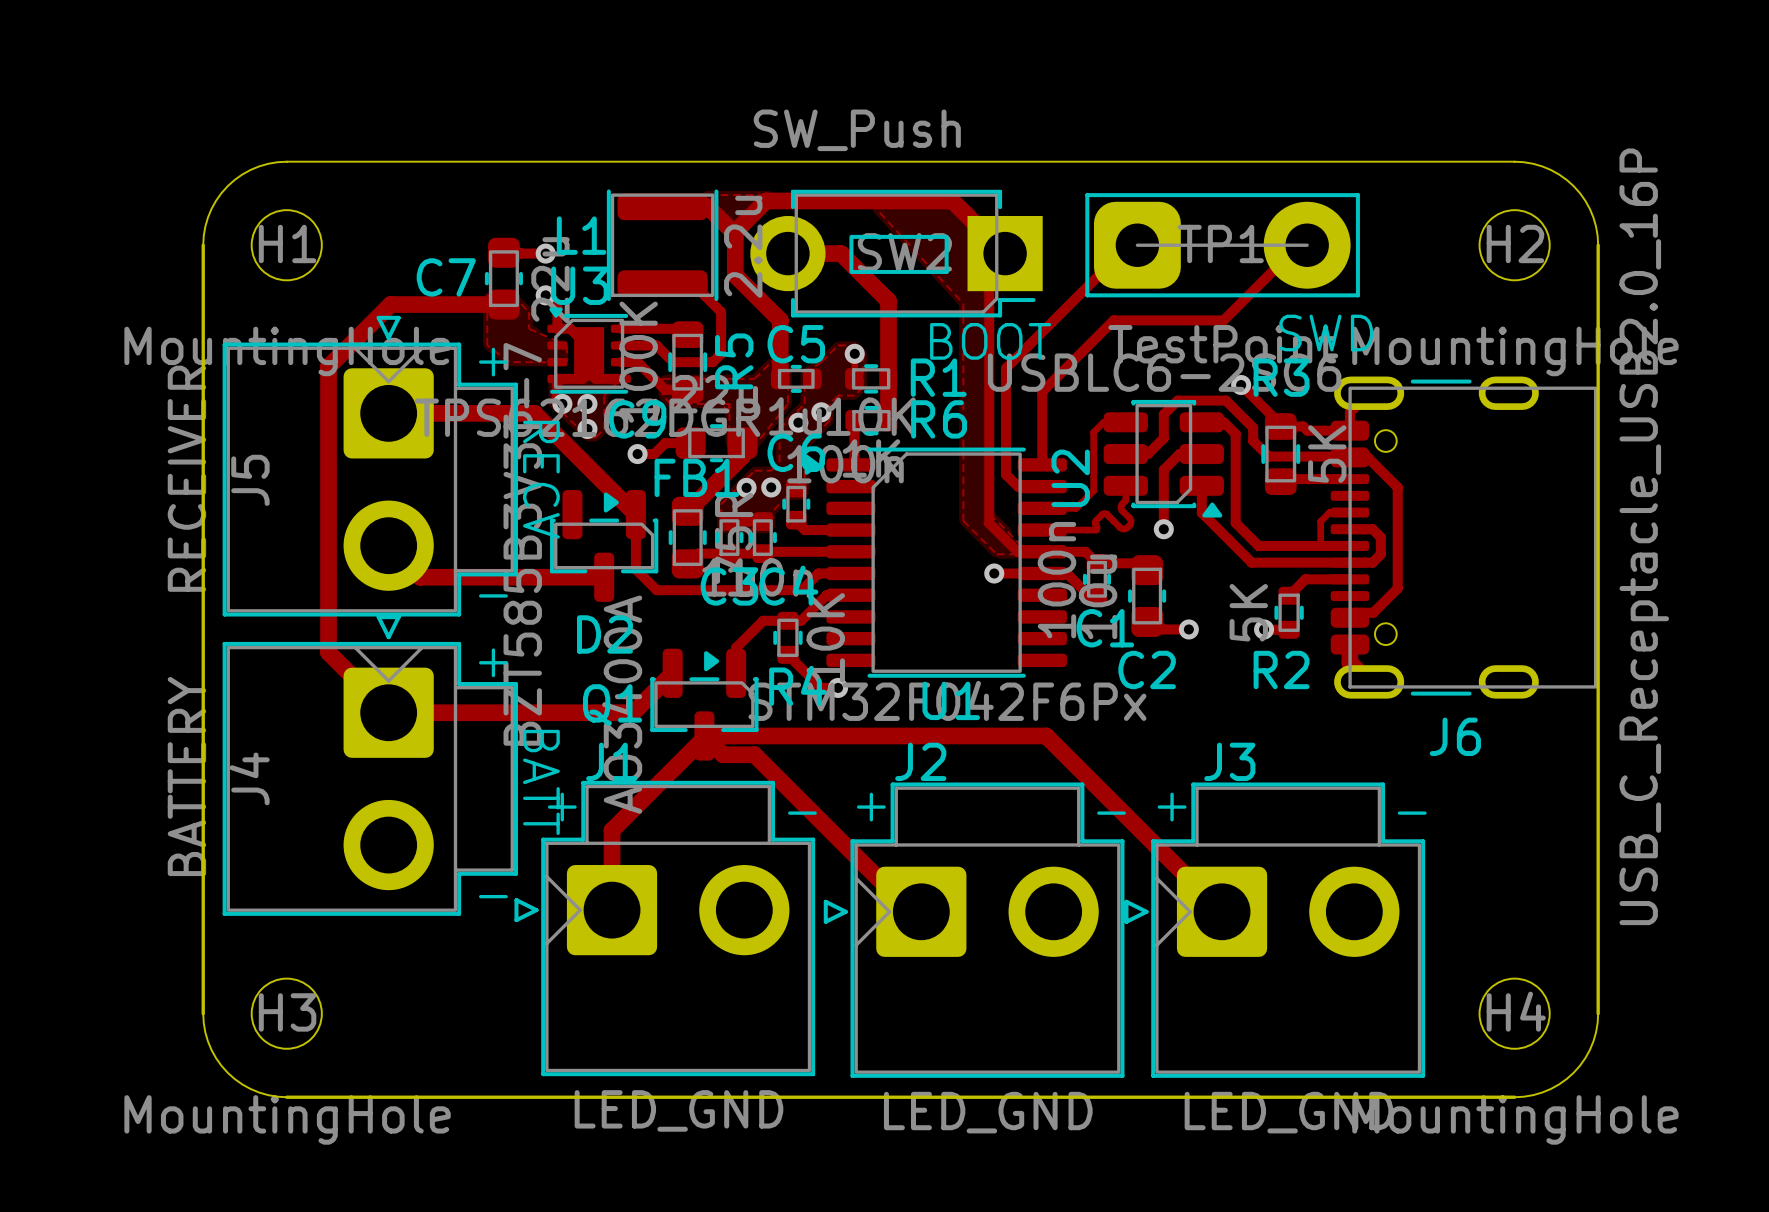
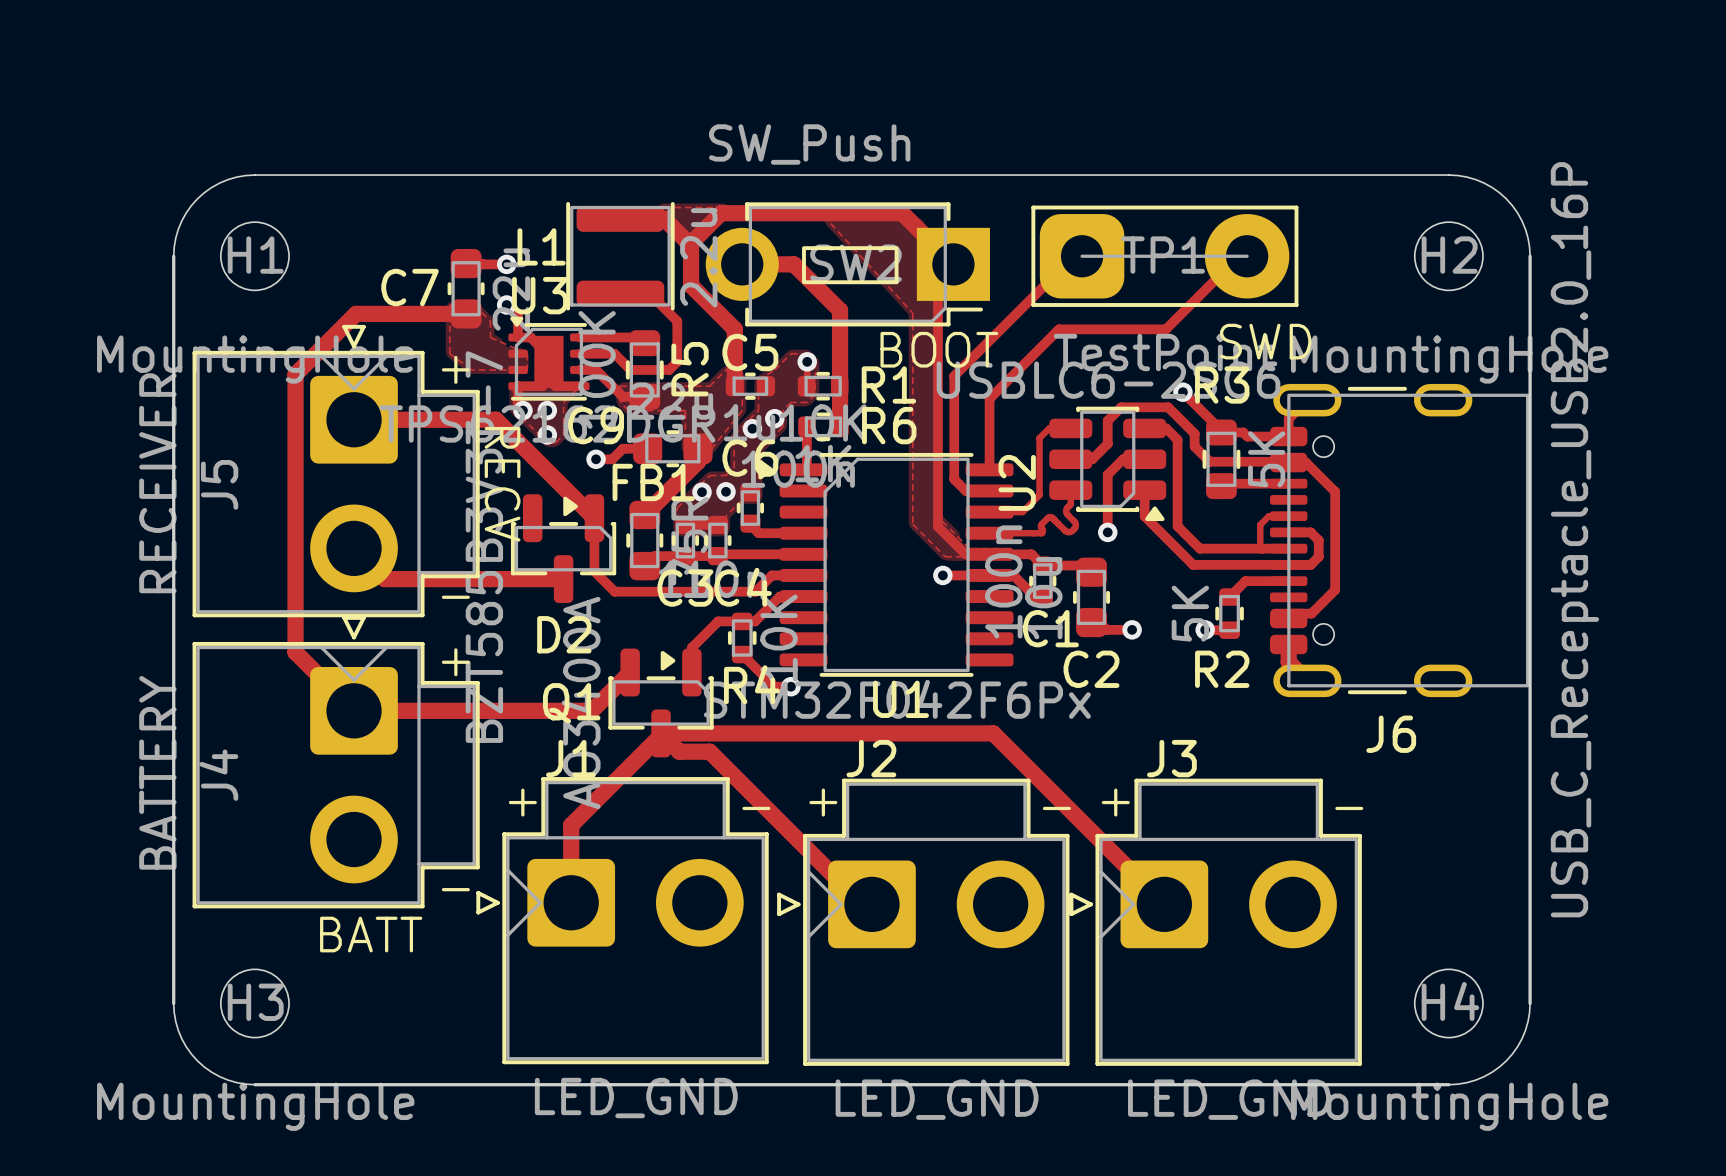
text rotation: 0° (541, 782) -> 90° counterclockwise (371, 934)
text position: BATT (541, 782) -> BATT (371, 934)

